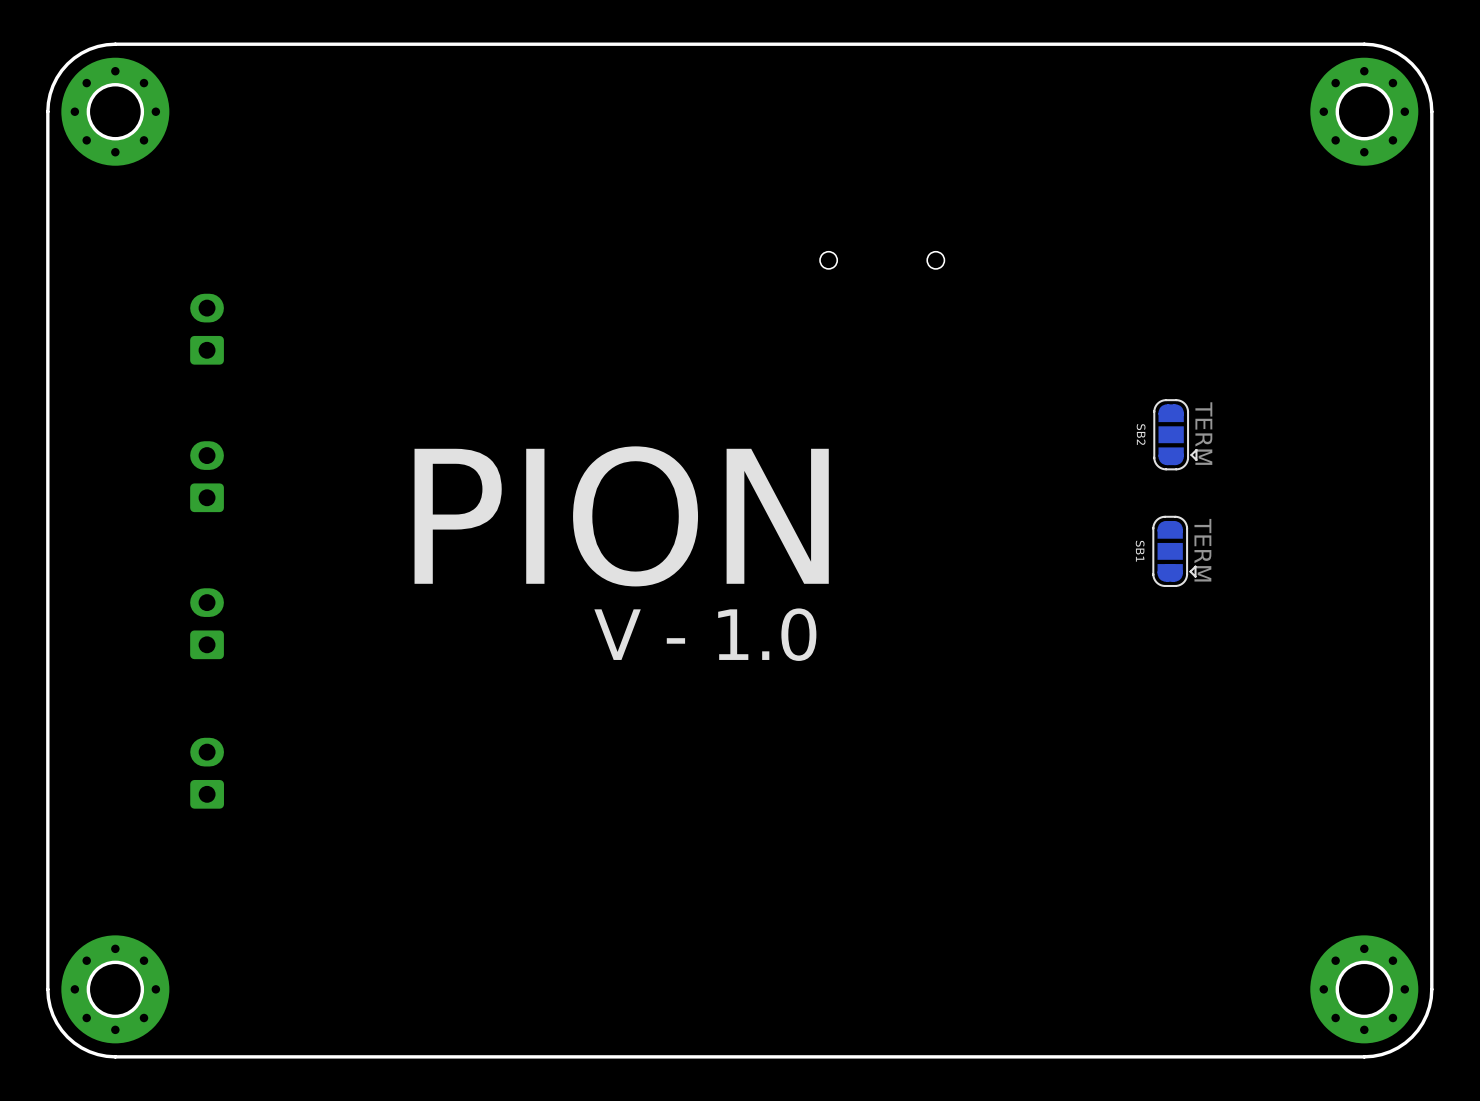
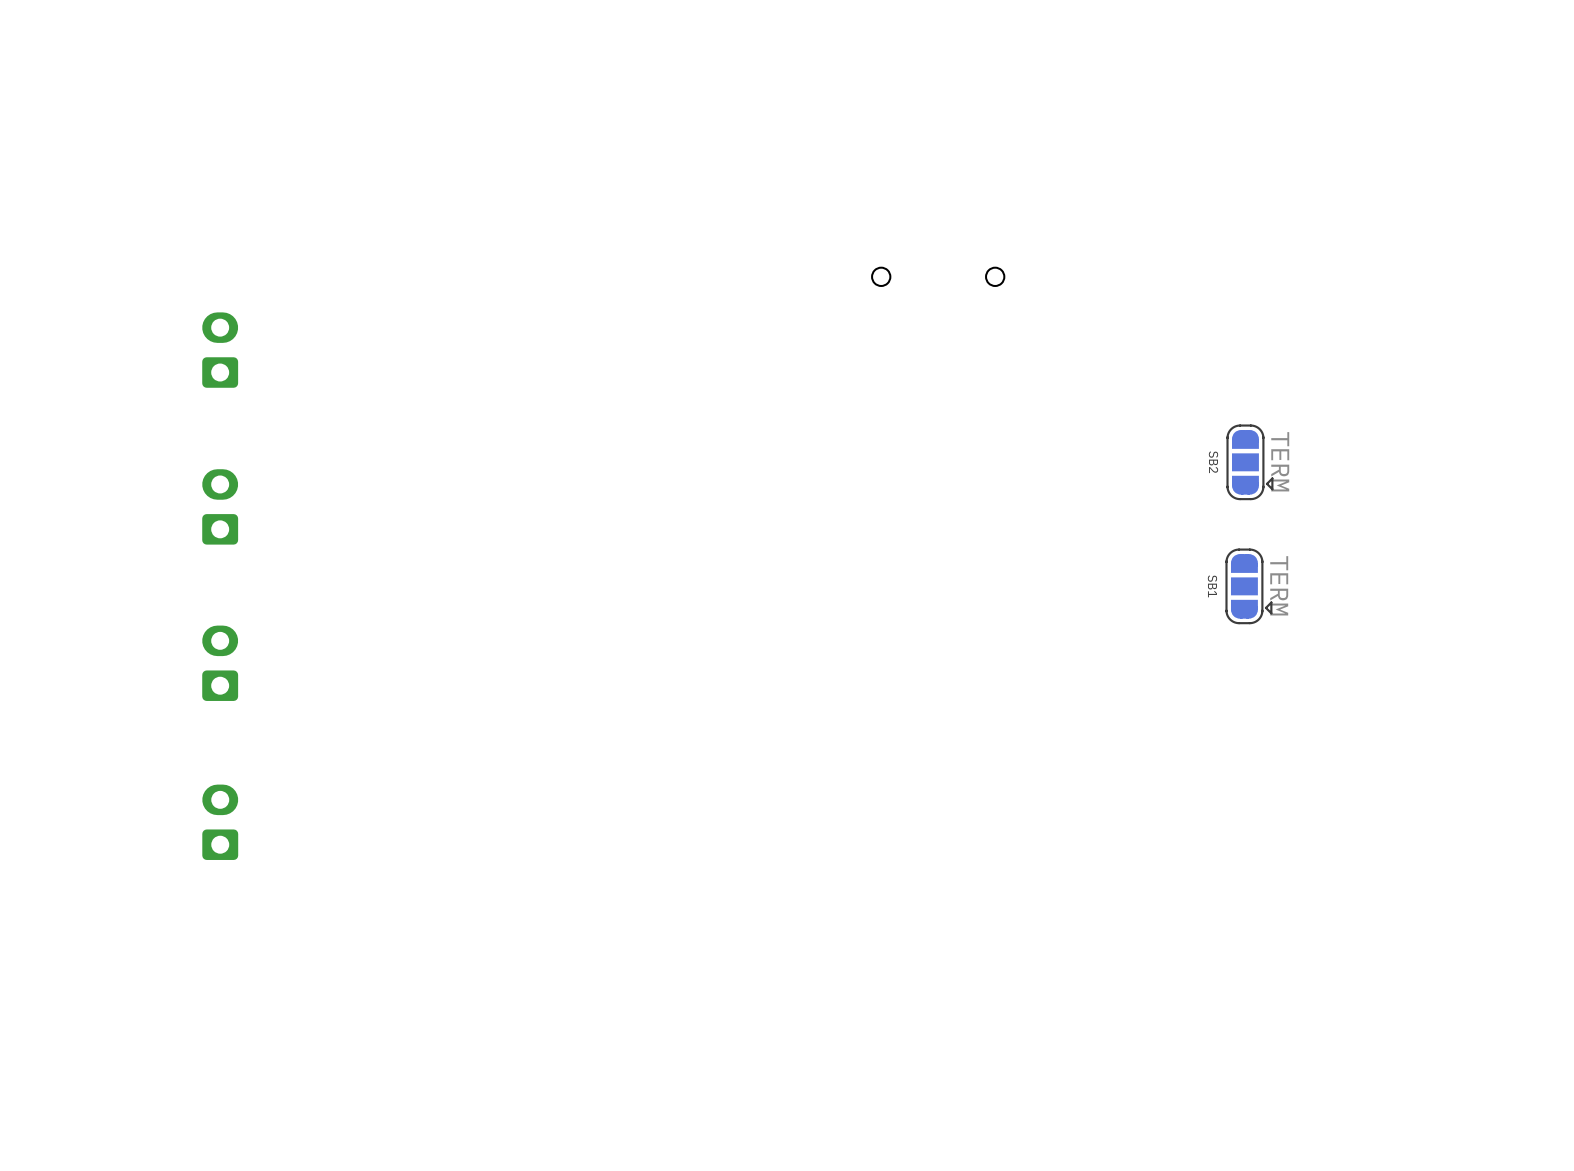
board edge: (1364, 44) (115, 44) (89, 49) (74, 58) (56, 77) (50, 94) (47, 111) (47, 989) (52, 1015) (61, 1030) (81, 1047) (97, 1054) (115, 1056) (1364, 1056) (1381, 1054) (1405, 1042) (1422, 1023) (1429, 1006) (1431, 989) (1431, 111) (1426, 85) (1412, 63) (1390, 49) (1364, 44) -> none
round board edge: [86, 83, 145, 141] -> none
round board edge: [1335, 83, 1393, 141] -> none
part: (115, 111) -> none
part: (1364, 111) -> none
text: PION (621, 516) -> none
text: V - 1.0 (705, 634) -> none
round board edge: [86, 960, 145, 1019] -> none
round board edge: [1335, 960, 1393, 1019] -> none
part: (115, 989) -> none
part: (1364, 989) -> none

